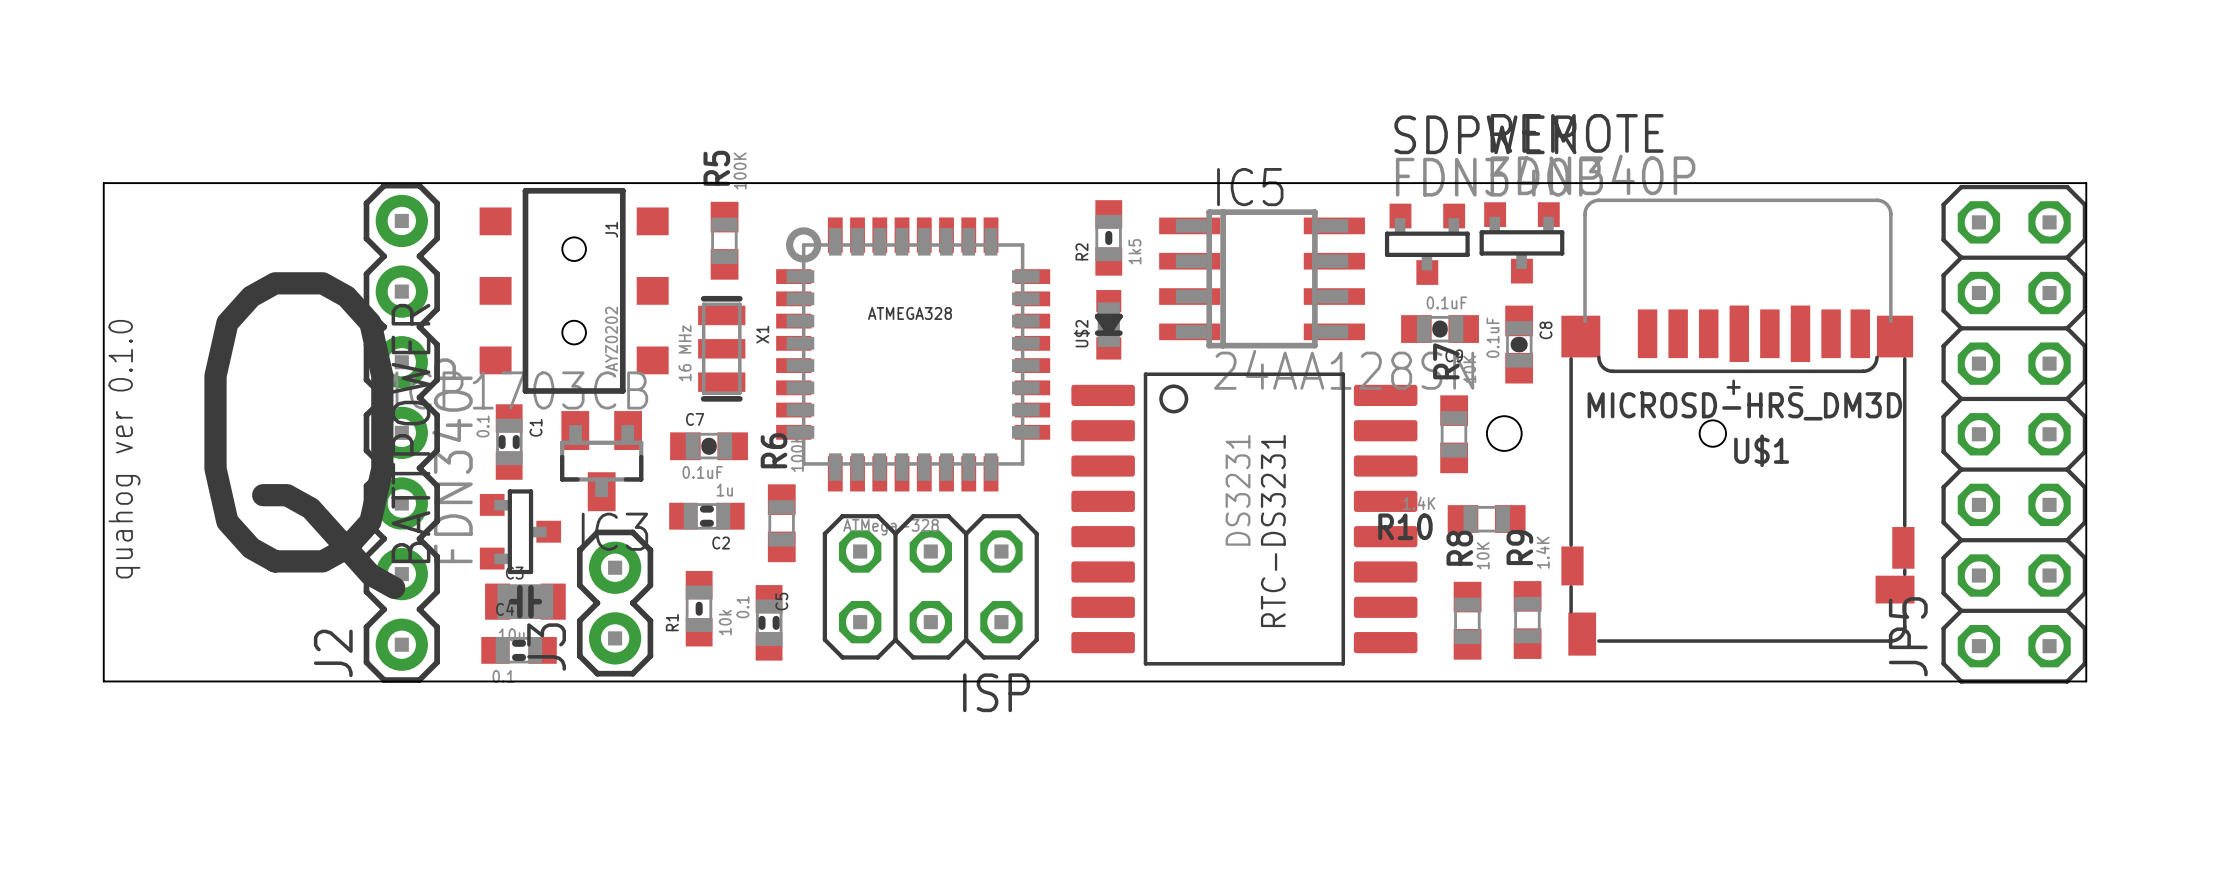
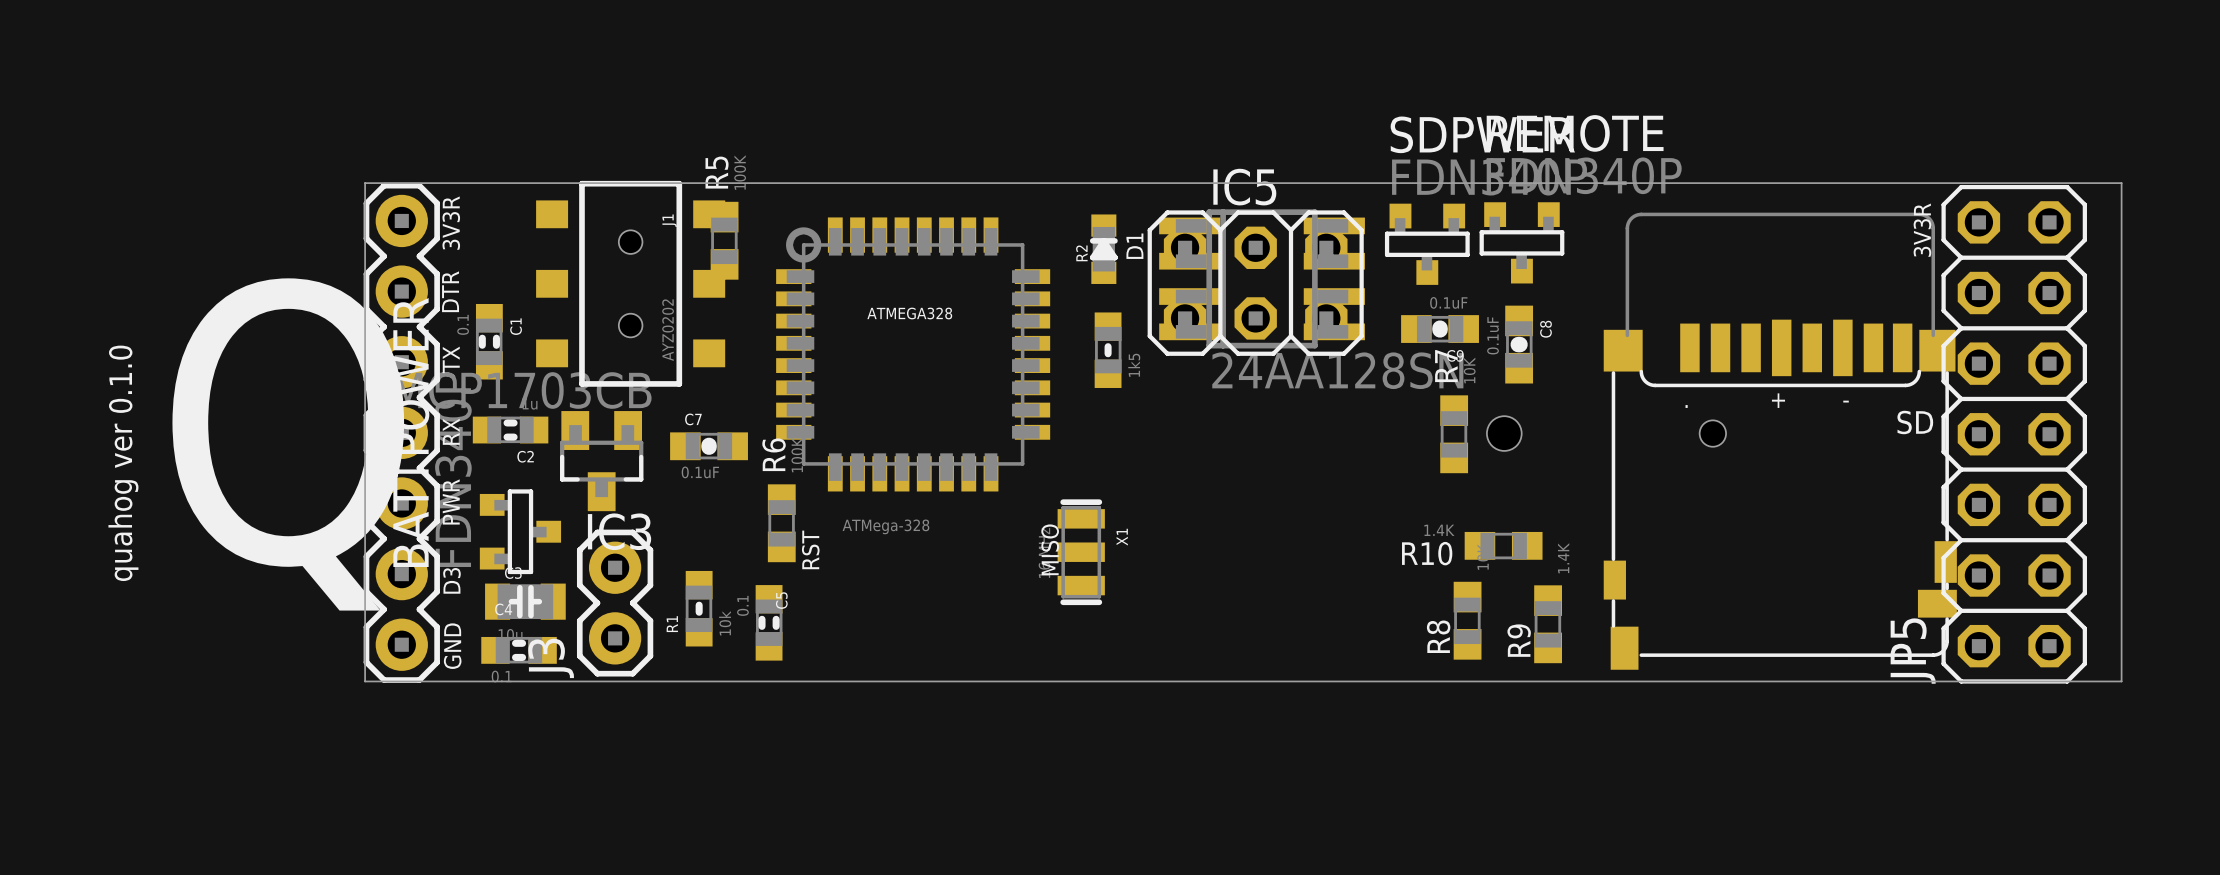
board edge: (365, 183) (103, 183) (103, 681) (365, 681) -> (365, 183) (365, 681)
board edge: (2086, 183) (2086, 681) -> (2086, 183) (2121, 183) (2121, 681) (2086, 681)
text: none -> 3V3R (451, 223)
text: none -> 3V3R (1922, 230)
R2 position: (1108, 237) -> (1108, 350)
D1: none -> (1103, 249)
part: none -> (1255, 283)
text: none -> DTR (450, 291)
J1 position: (574, 290) -> (630, 283)
U$2: (1108, 324) -> none
X1 position: (721, 348) -> (1081, 552)
text: none -> TX (451, 359)
U$1: MICROSD-HRS_DM3D (1737, 427) -> none
text: none -> RX (451, 431)
SD: none -> (1780, 441)
C1 position: (509, 442) -> (489, 341)
text: none -> PWR (451, 501)
C2 position: (706, 516) -> (510, 430)
RTC-DS3231: DS3231 (1244, 519) -> none
R10 position: (1486, 519) -> (1503, 545)
text: none -> RST (810, 549)
R9 name position: R9 (1519, 547) -> R9 (1519, 640)
R8 name position: R8 (1459, 548) -> R8 (1438, 636)
text: none -> MISO (1050, 549)
text: none -> D3 (451, 580)
ISP: (930, 586) -> none
R9 position: (1527, 620) -> (1548, 624)
text: none -> GND (452, 646)
J2 name: J2 (333, 653) -> none

